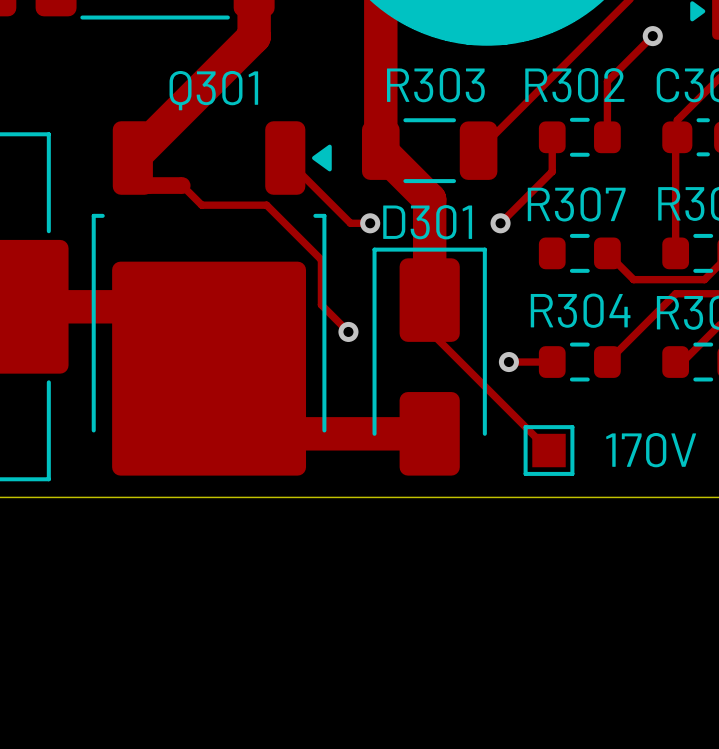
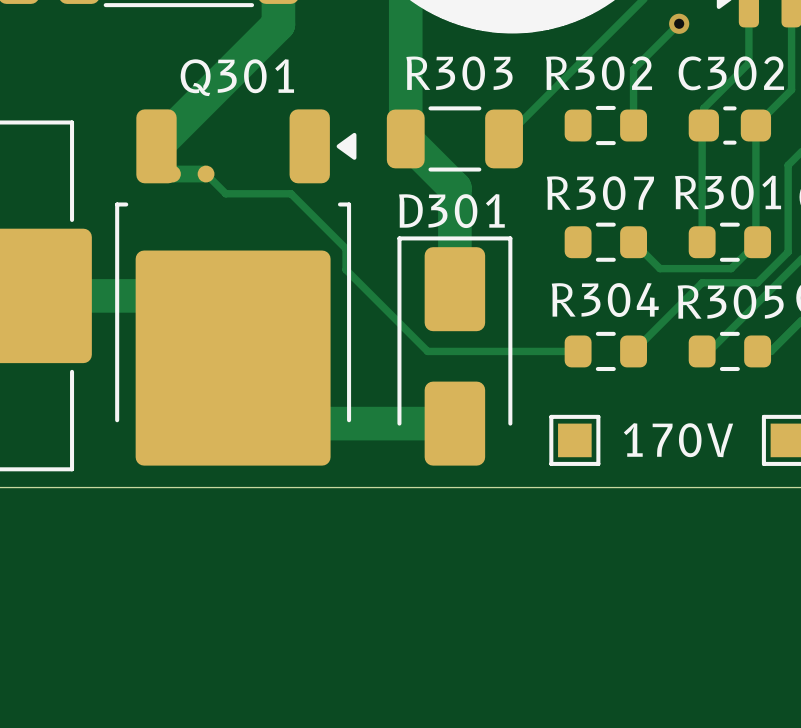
track: (552, 137) (552, 171) (500, 223) -> none
track: (285, 158) (350, 223) (370, 223) -> none
via: (370, 223) -> none
via: (500, 223) -> none
track: (321, 280) (321, 304) (348, 331) -> (346, 269) (427, 351) (534, 351)
track: (429, 300) (429, 331) (549, 450) -> none
via: (348, 331) -> none
via: (508, 362) -> none

